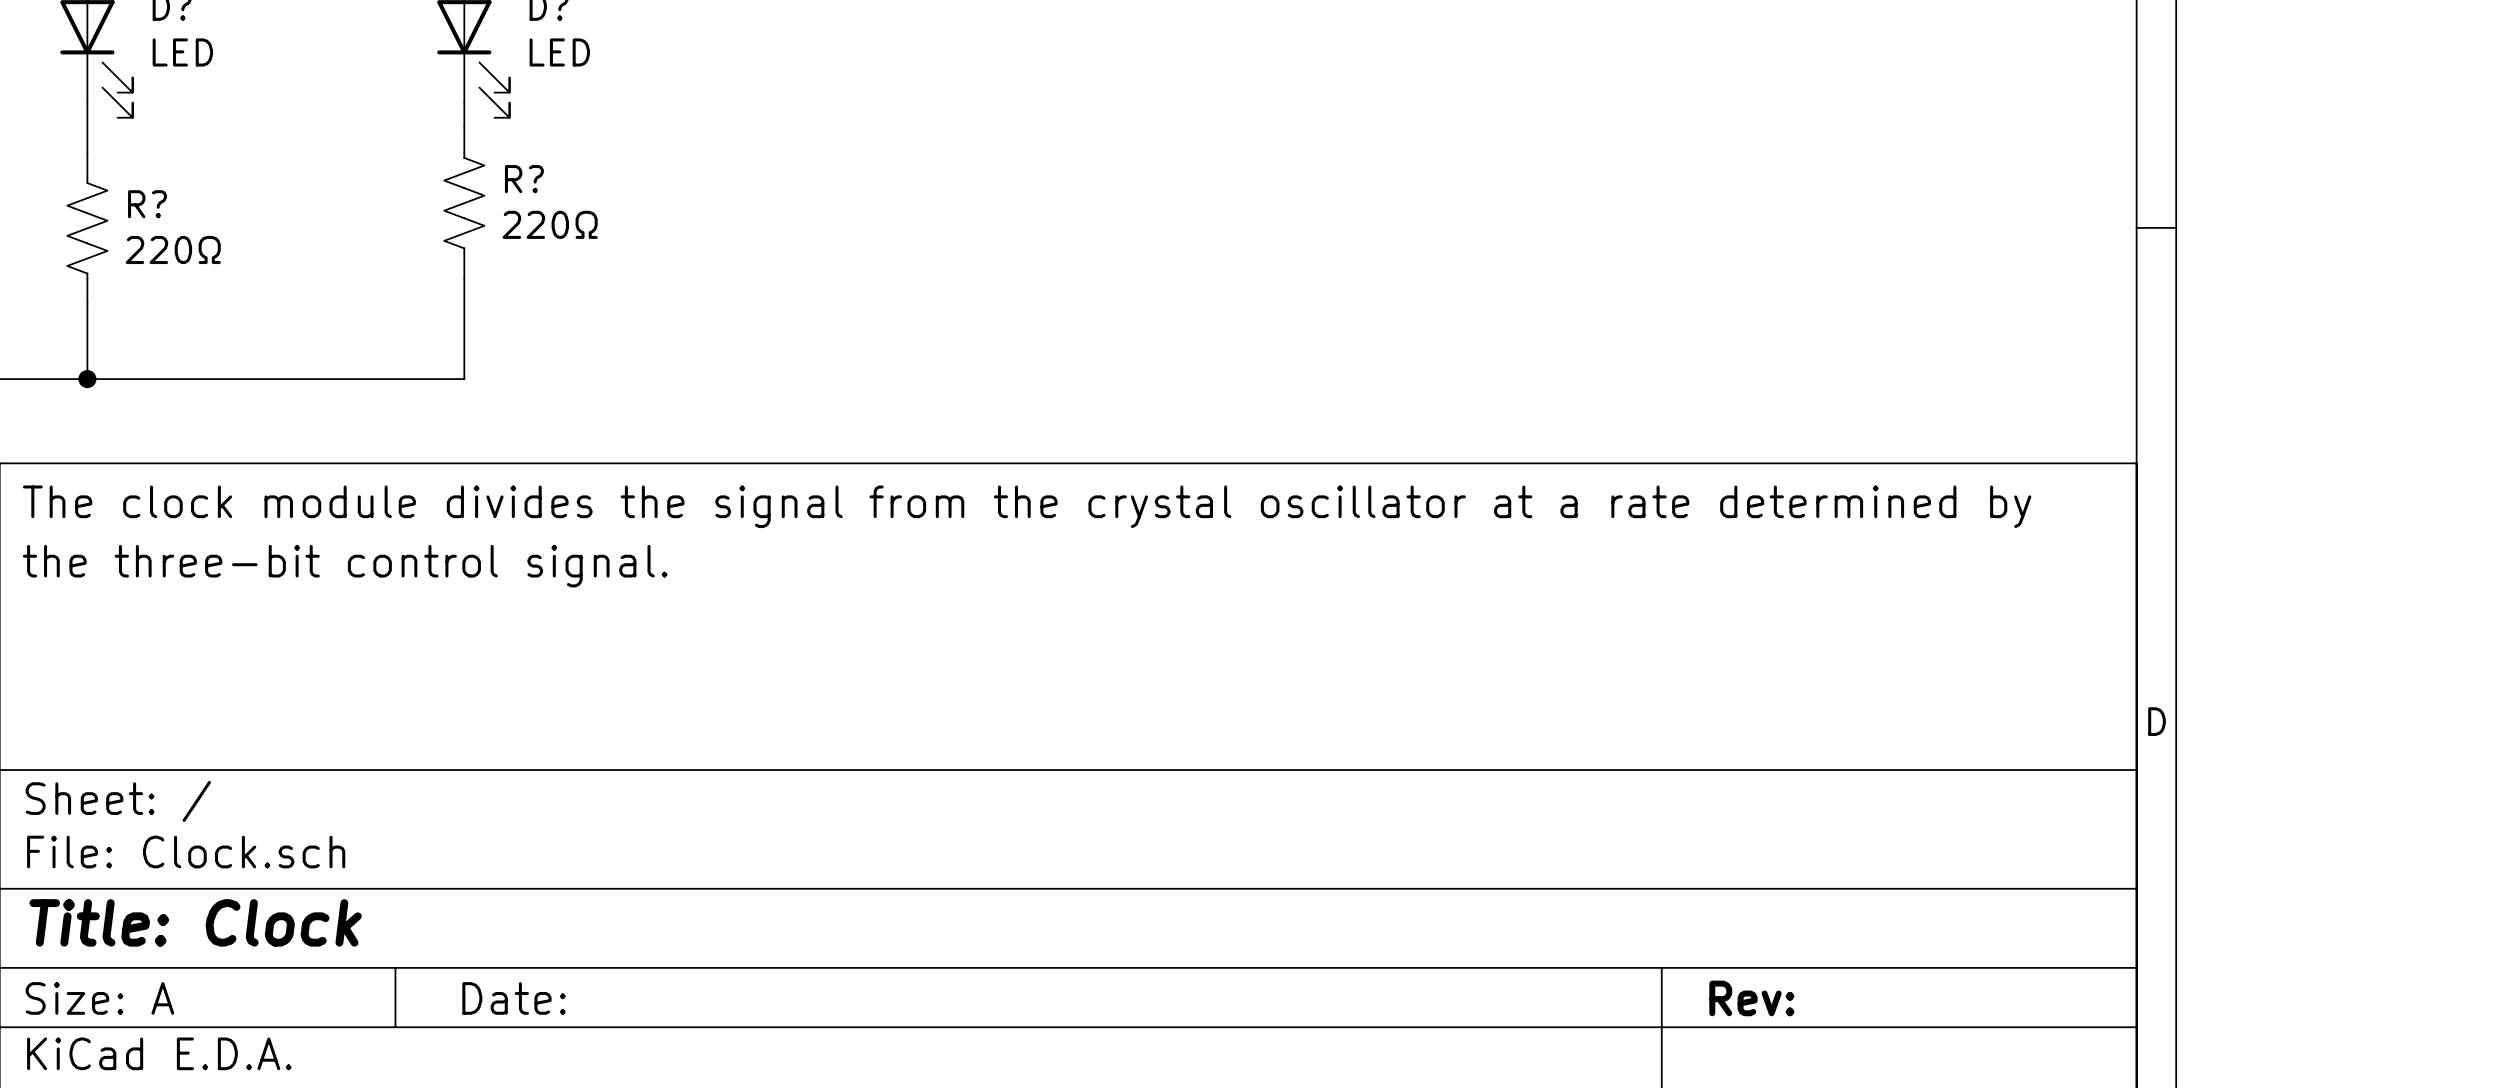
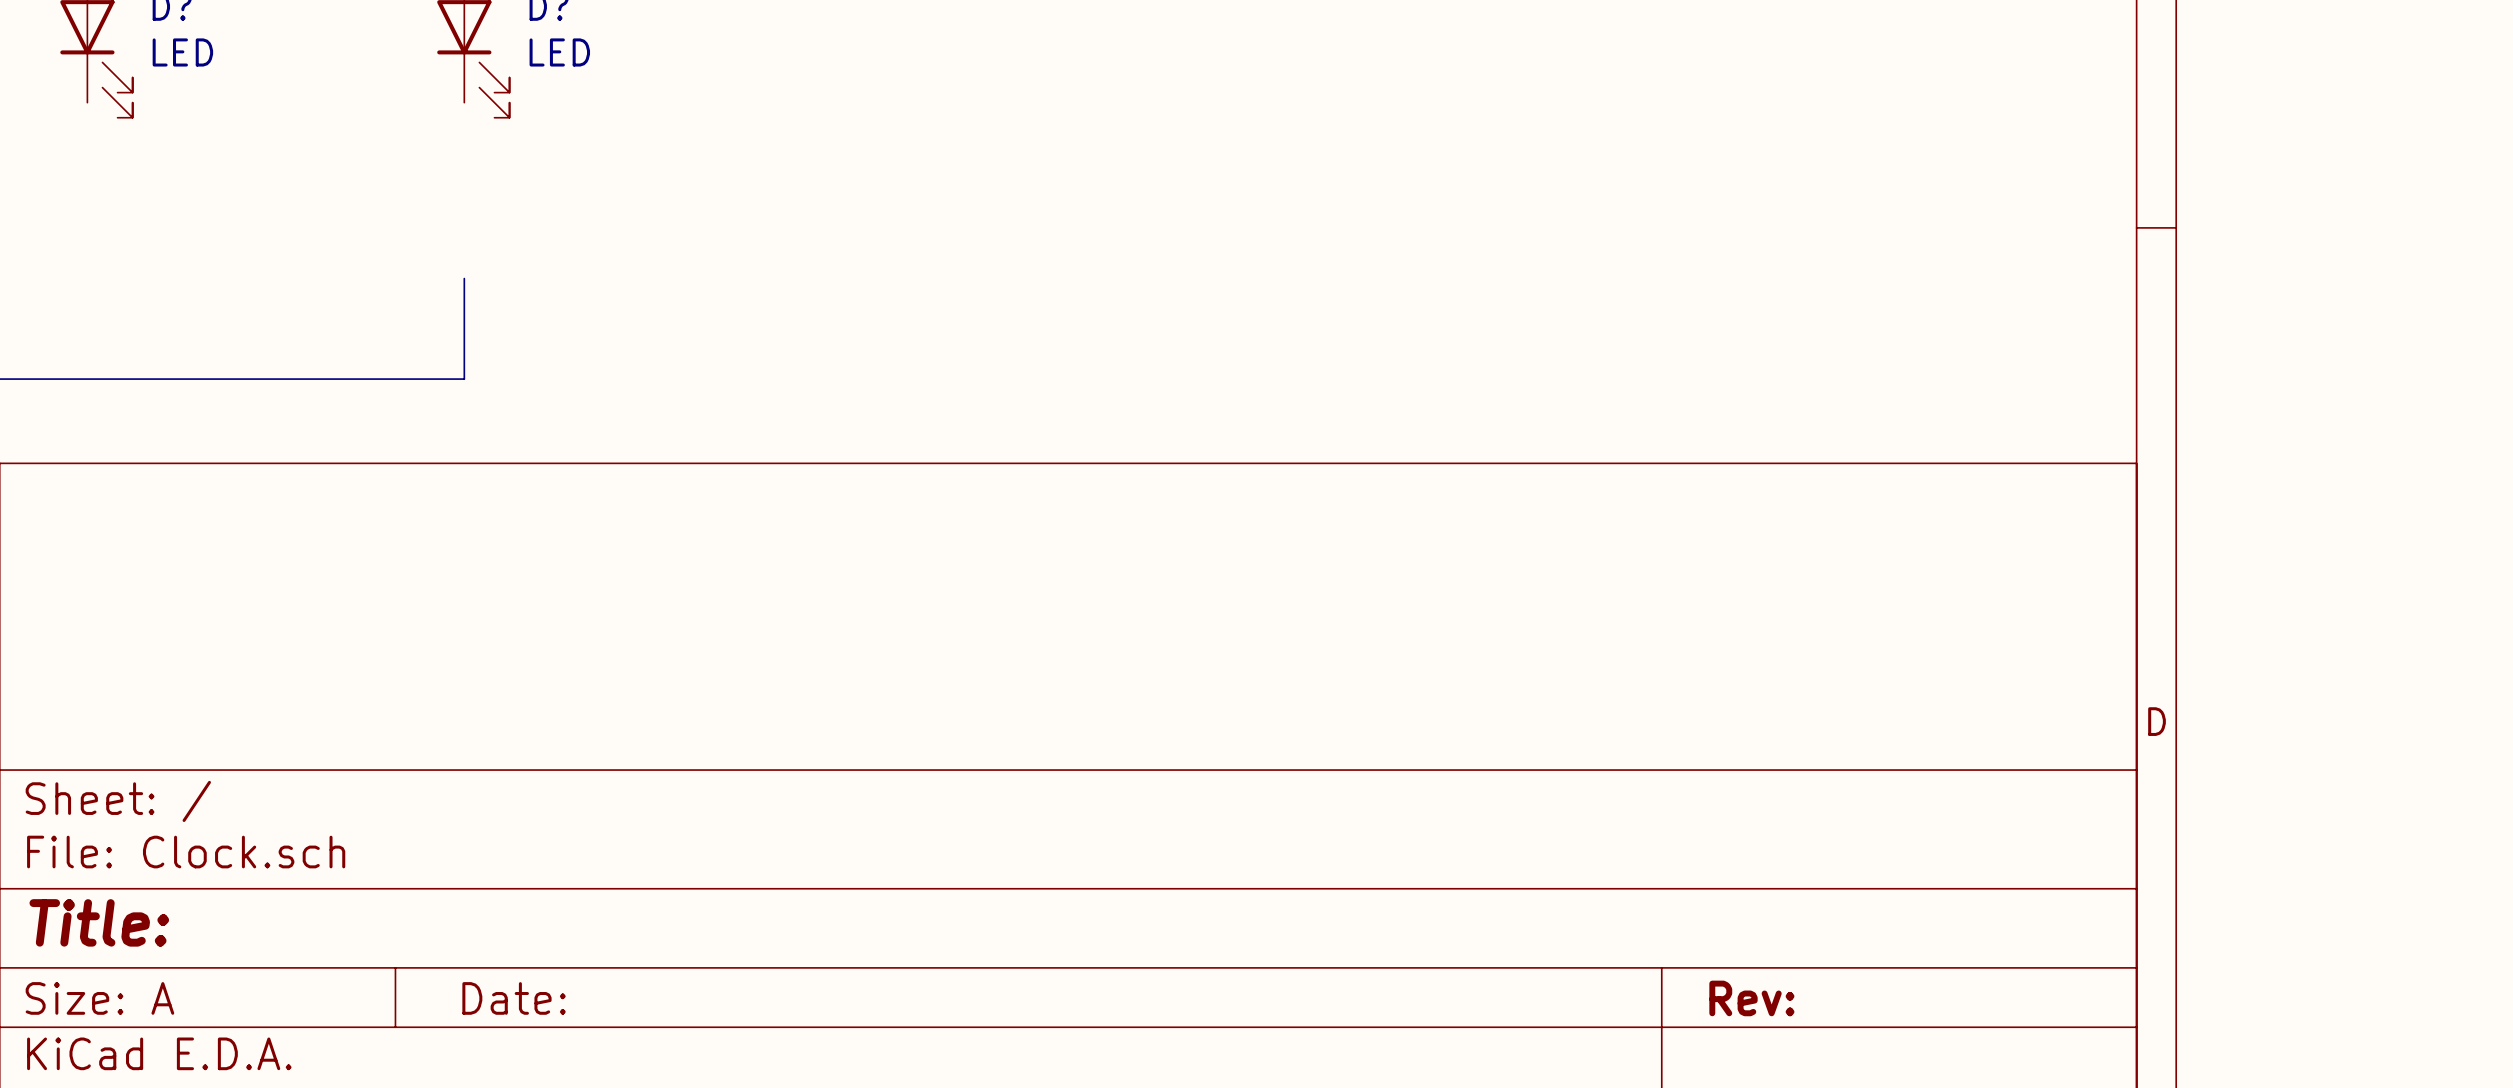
wire: (87, 102) (87, 152) -> none
wire: (464, 102) (464, 127) -> none
R?: 220Ω (464, 203) -> none
R?: 220Ω (87, 228) -> none
wire: (87, 303) (87, 379) -> none
junction: (87, 379) -> none
title block: The clock module divides the signal from the crystal oscillator at a rate determined by (1027, 506) -> none
title block: the three-bit control signal. (345, 566) -> none
title block: Title: Clock (195, 922) -> Title: (99, 922)

